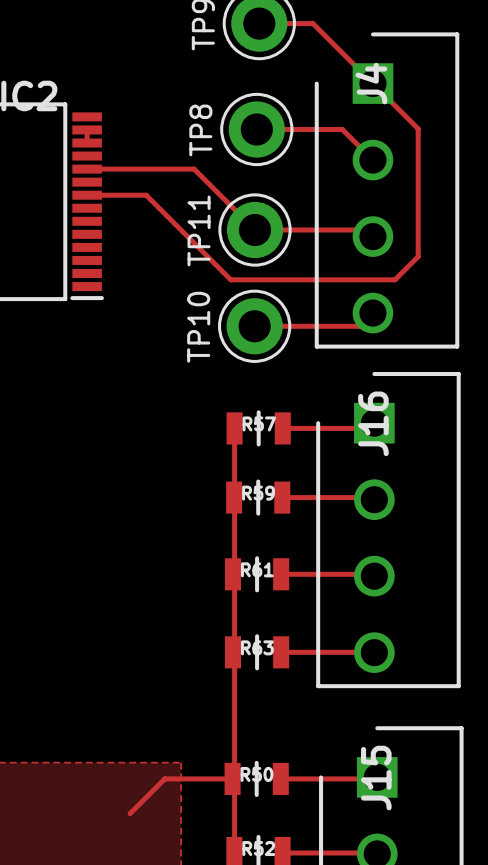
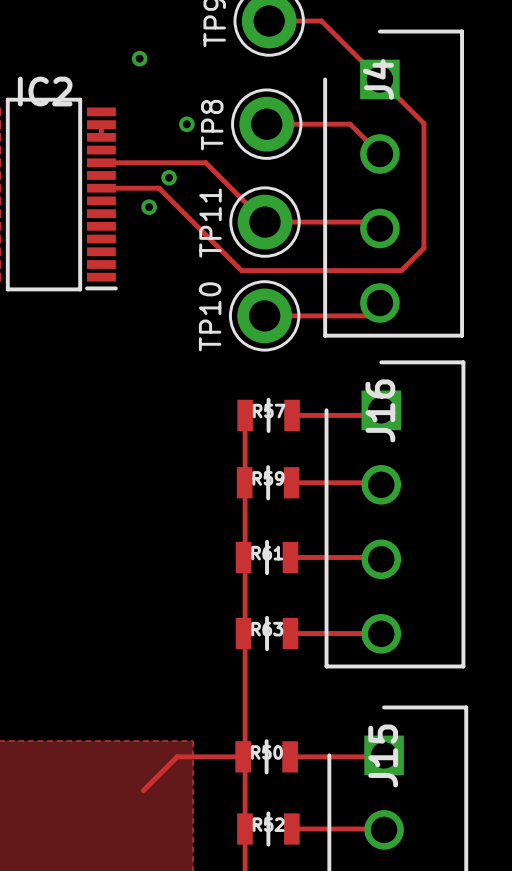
via: none -> (139, 58)
via: none -> (186, 124)
via: none -> (169, 177)
via: none -> (149, 207)

